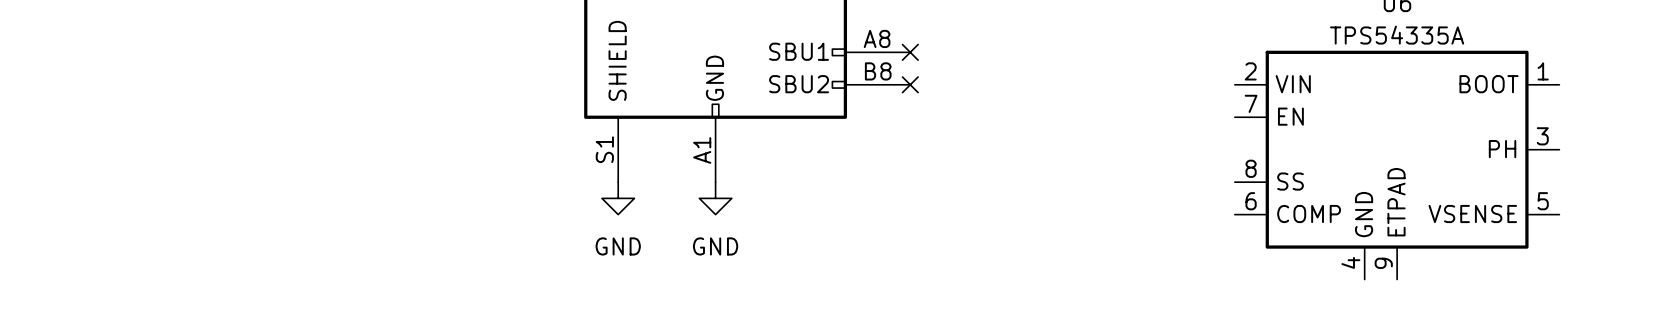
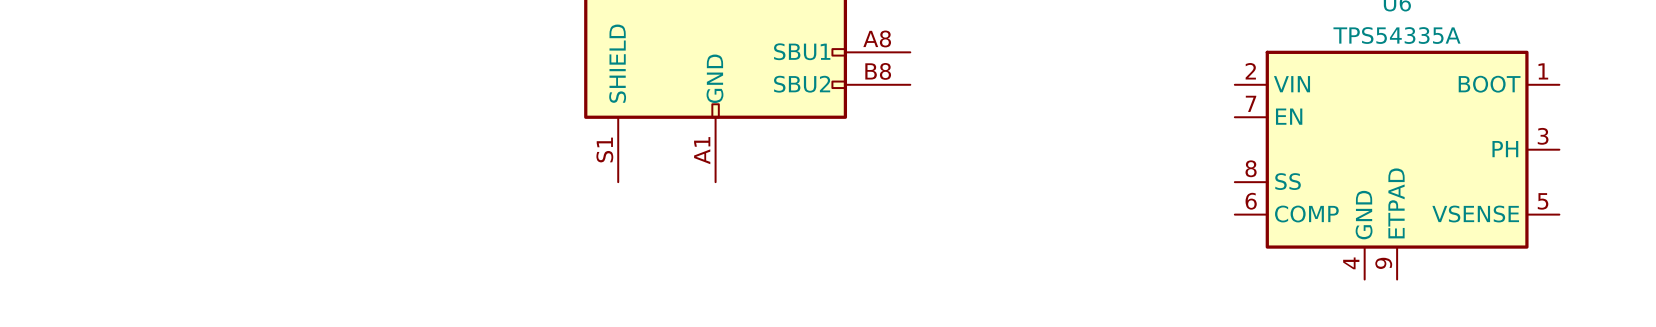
no-connect mark: (910, 52) -> none
no-connect mark: (910, 84) -> none
power symbol: GND (618, 198) -> none
power symbol: GND (715, 198) -> none

